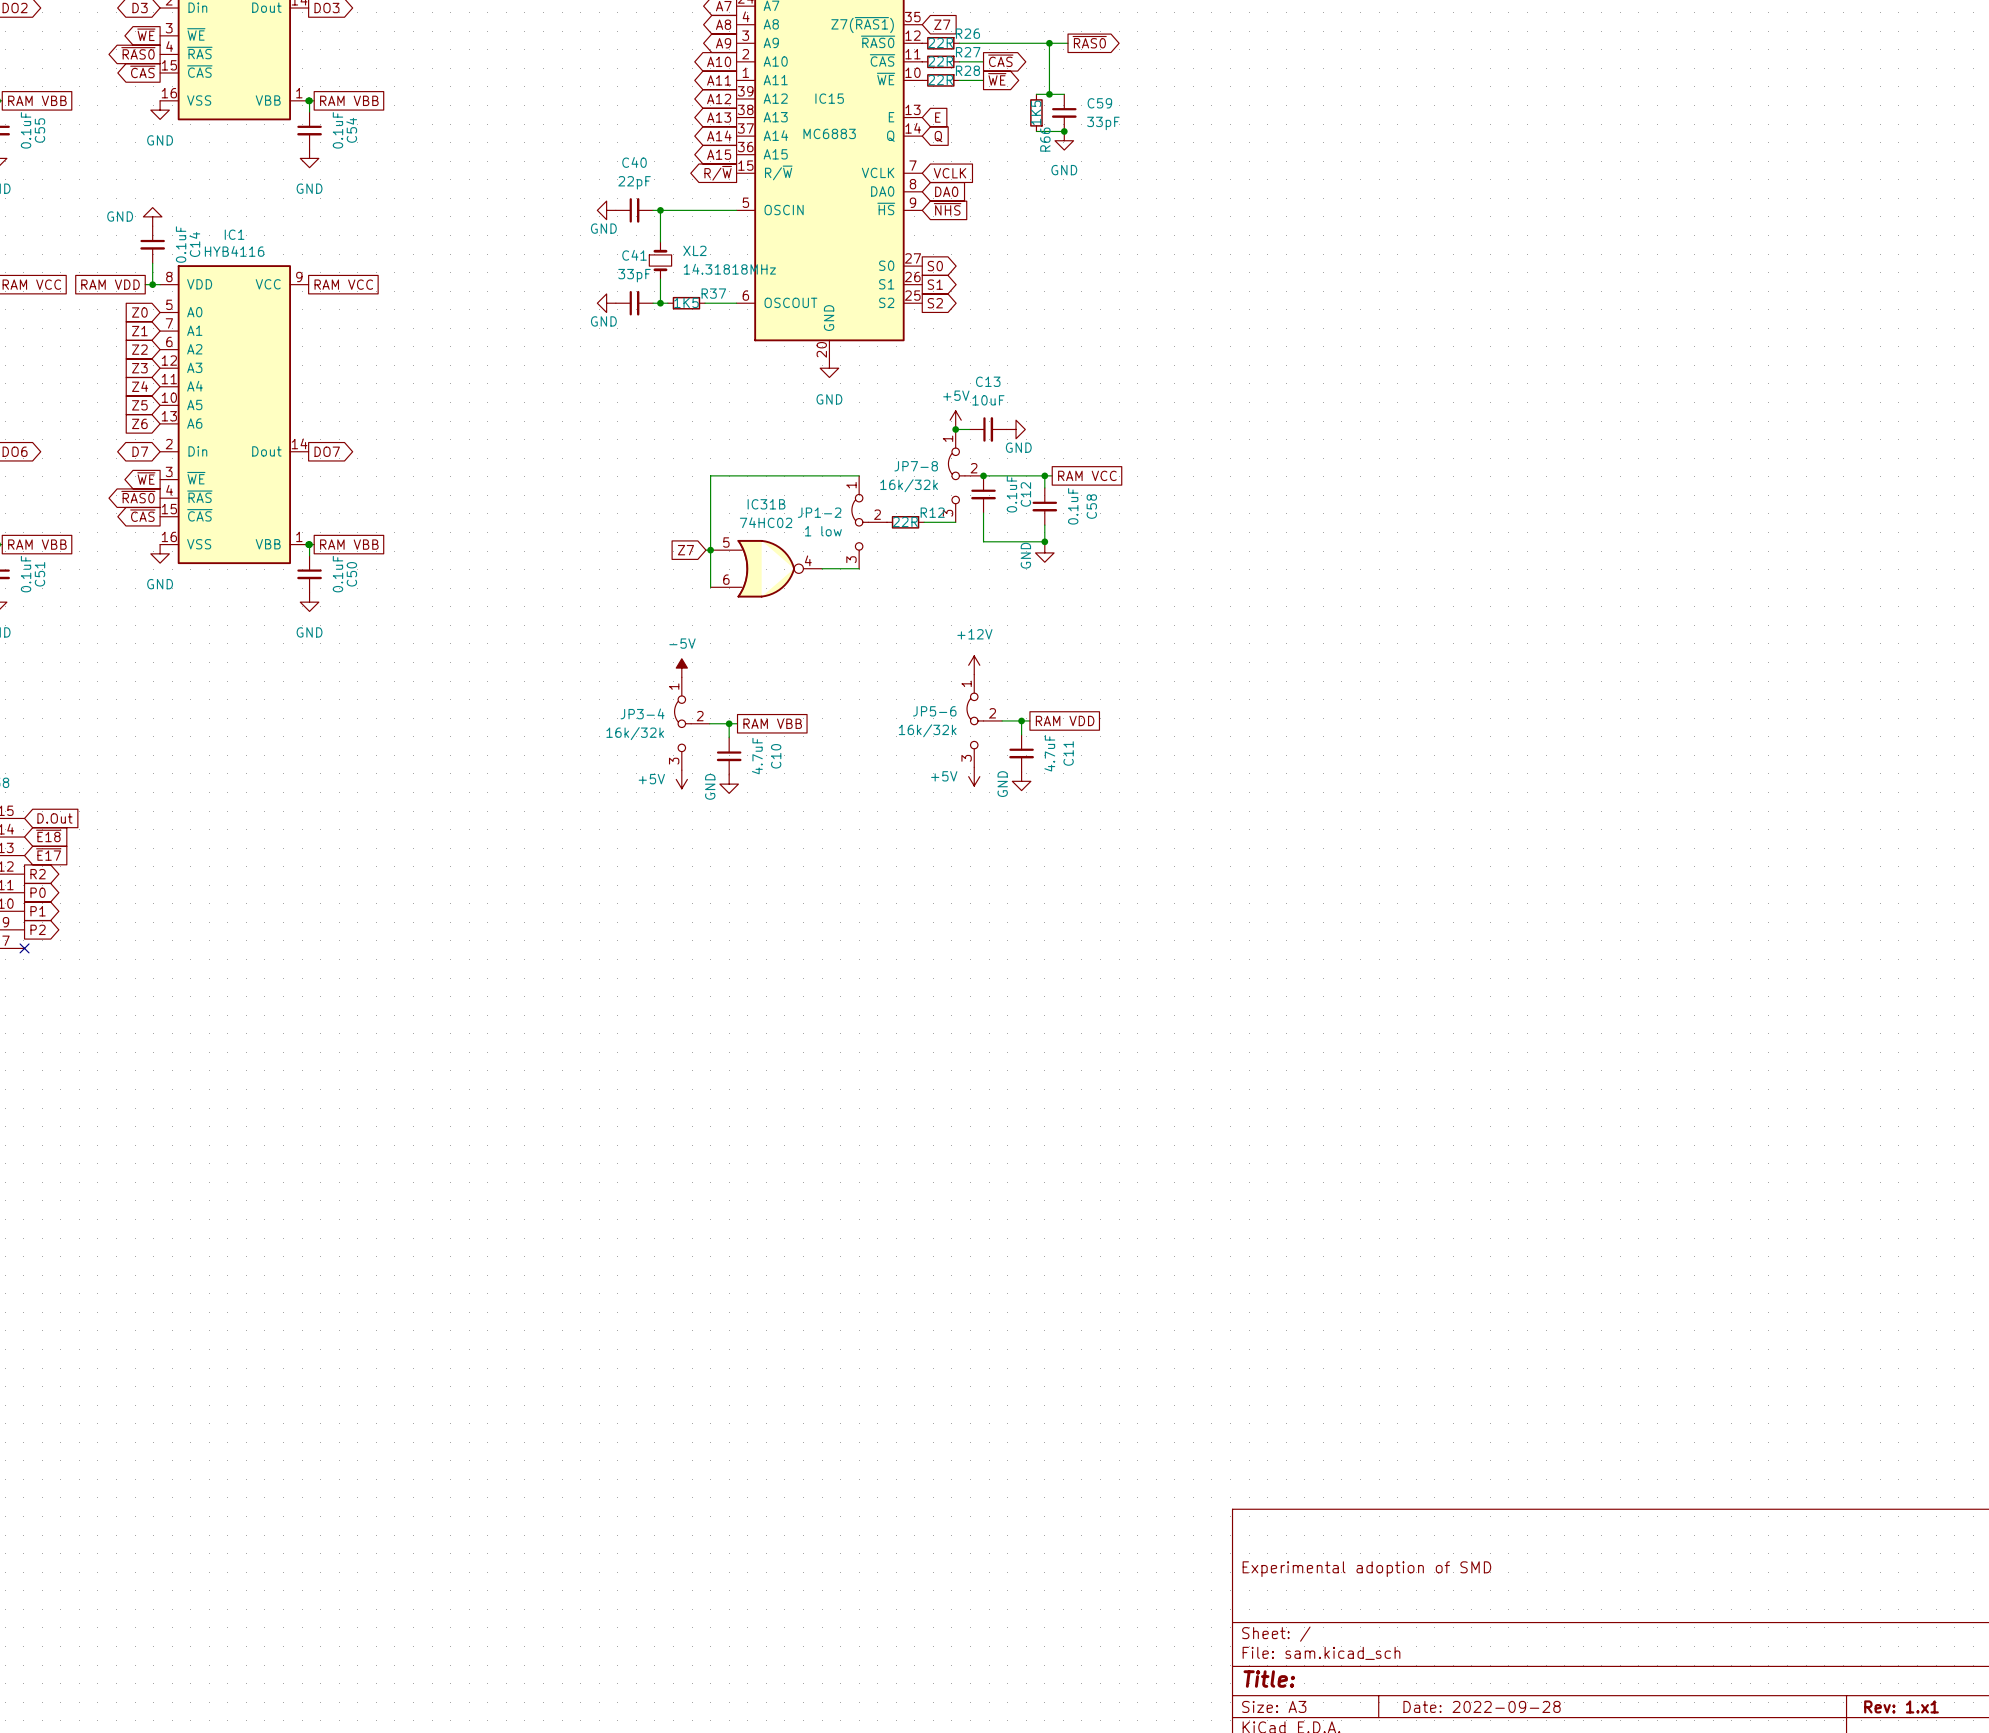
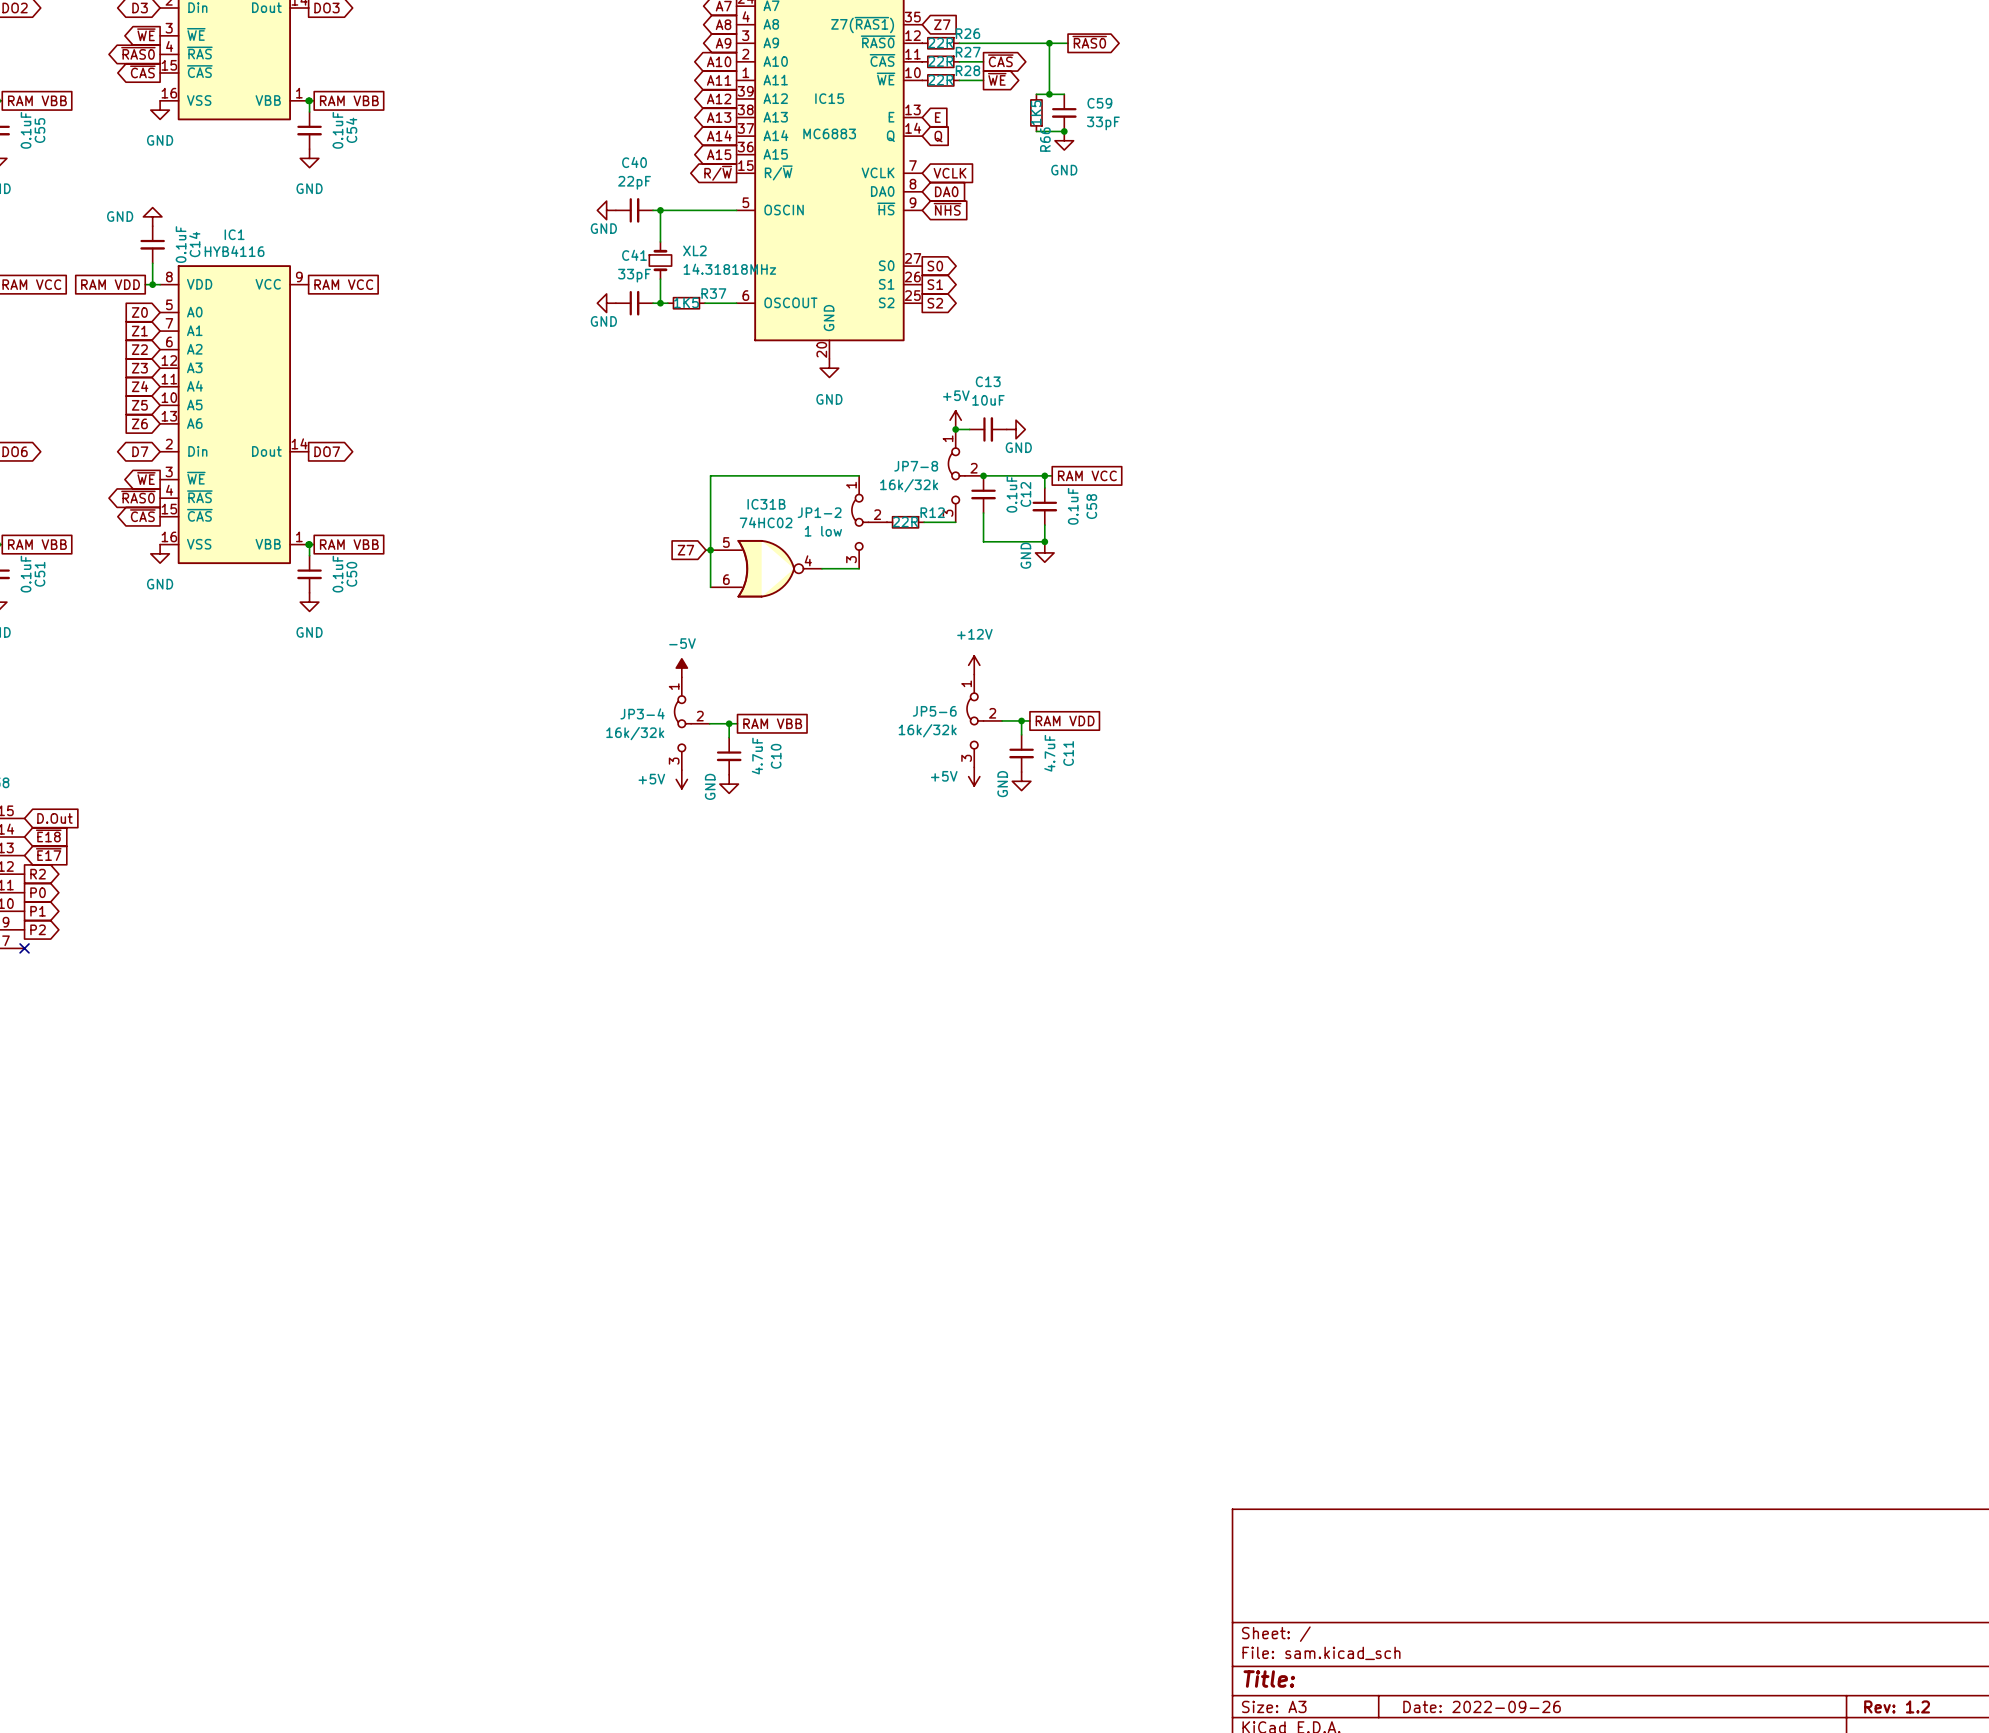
title block: Experimental adoption of SMD (1366, 1569) -> none
title block: Date: 2022-09-28 (1482, 1706) -> Date: 2022-09-26 (1482, 1706)
title block: Rev: 1.x1 (1901, 1706) -> Rev: 1.2 (1897, 1706)

